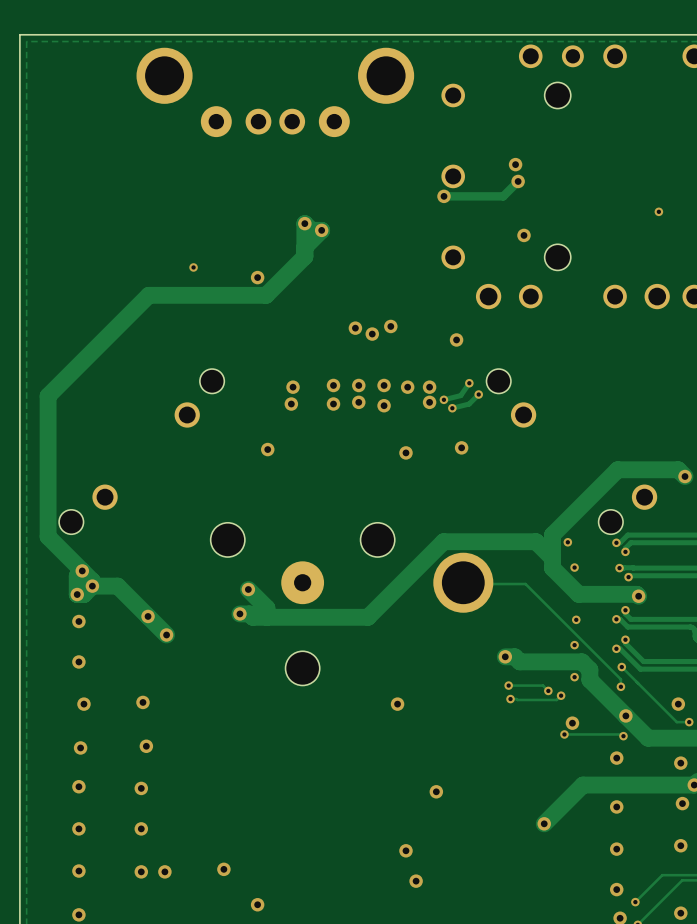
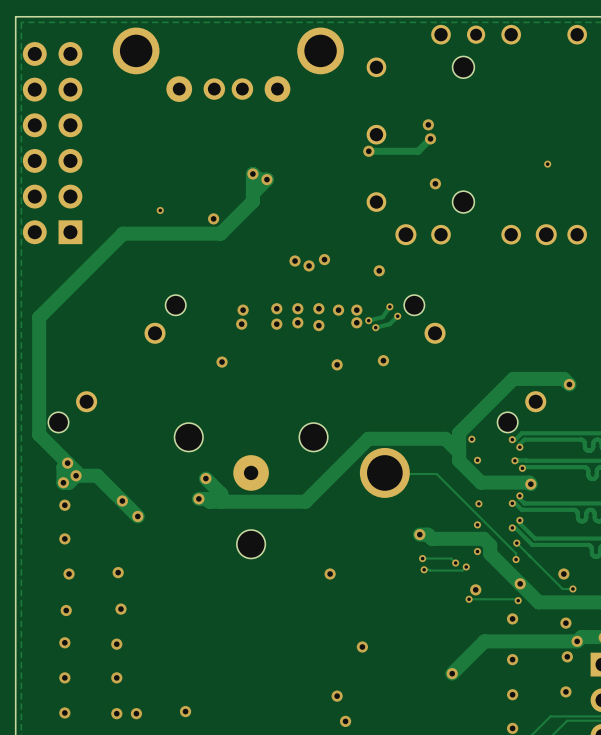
part: none -> (52, 143)

